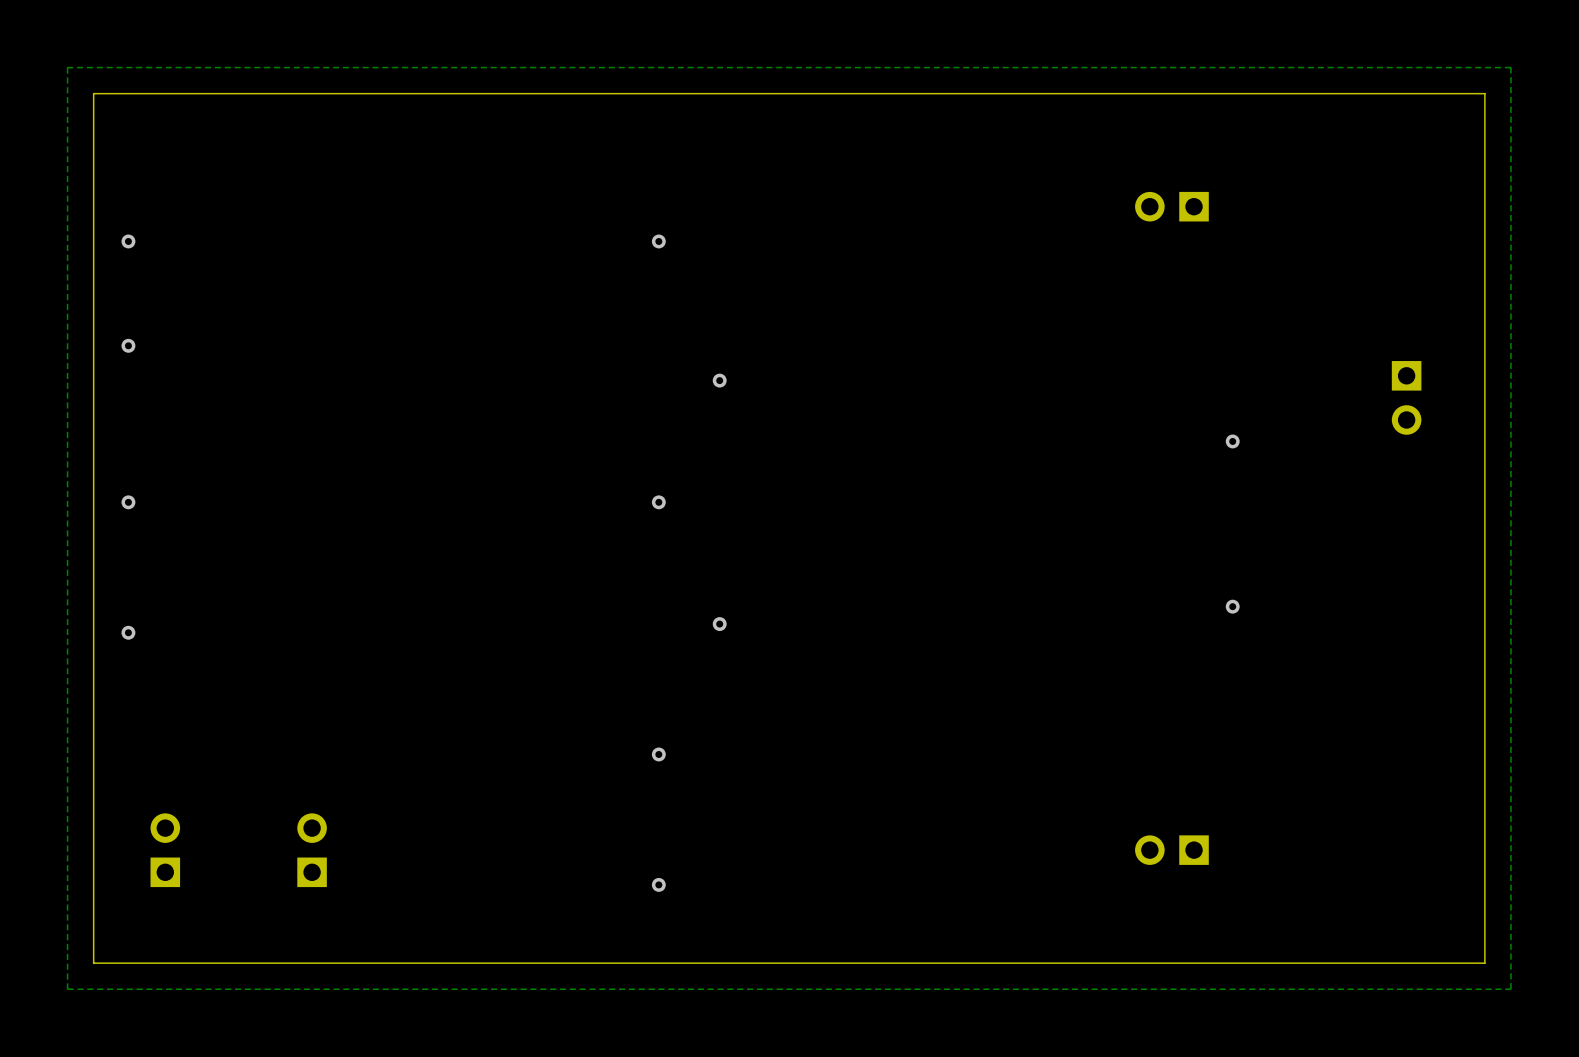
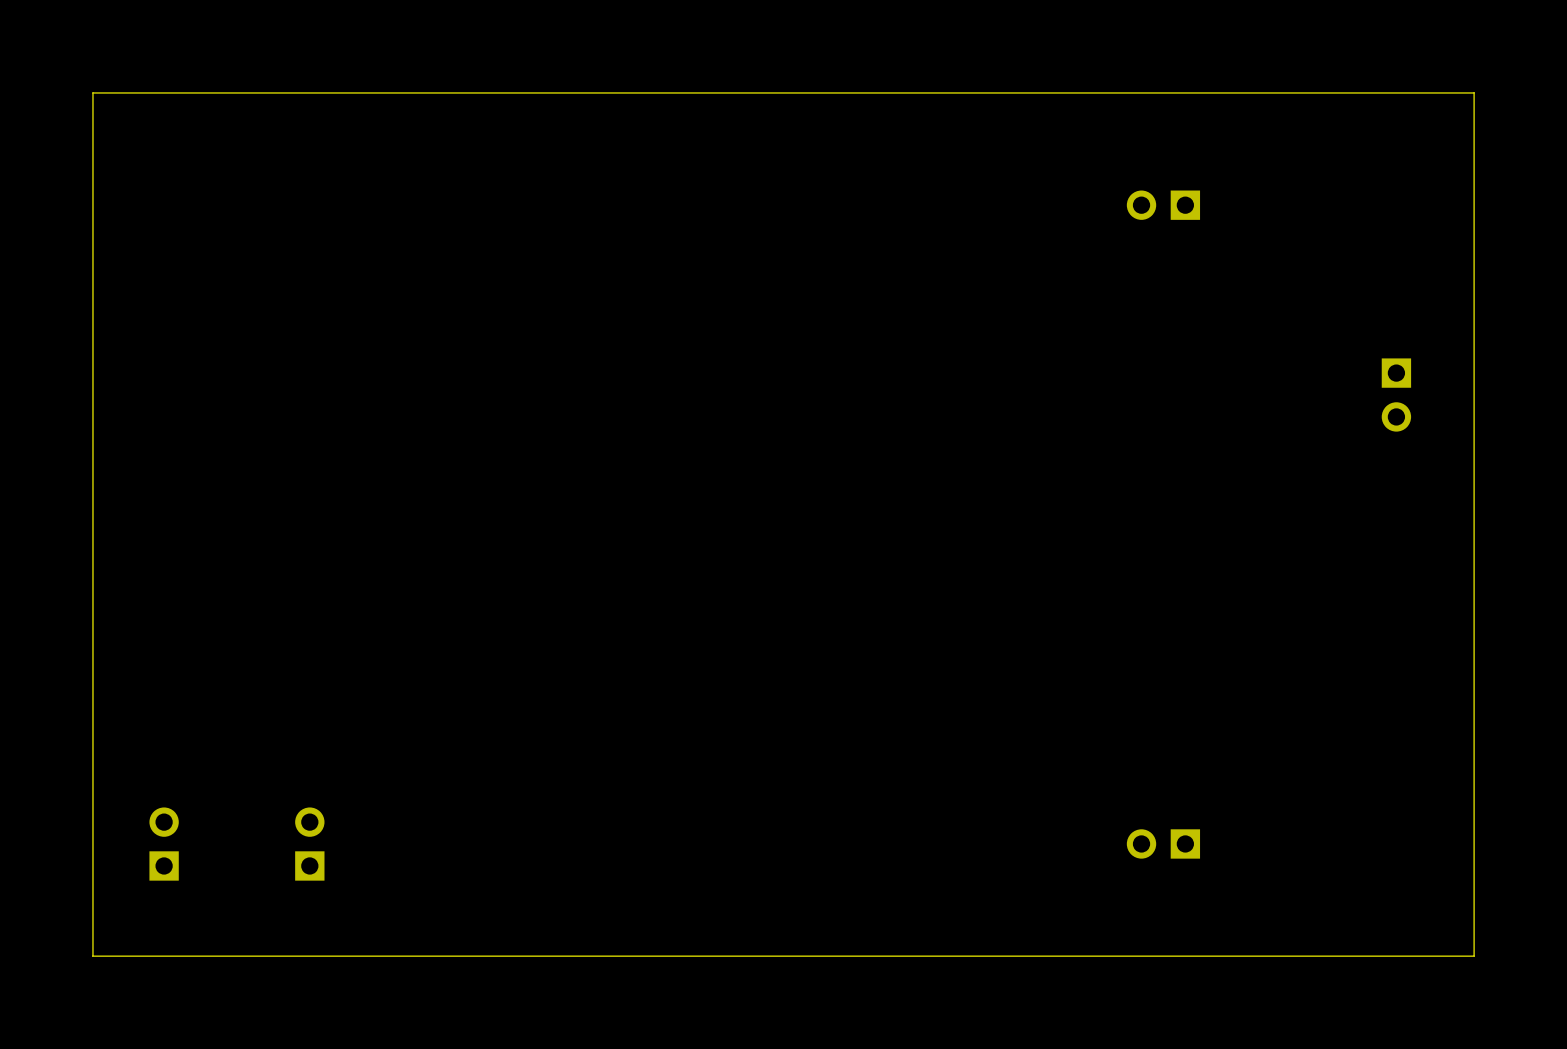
zone outline: (1510, 67) (67, 67) (67, 989) (1510, 989) (1510, 67) -> none
via: (128, 241) -> none
via: (658, 241) -> none
via: (128, 345) -> none
via: (719, 380) -> none
via: (1232, 441) -> none
via: (128, 502) -> none
via: (658, 502) -> none
via: (1232, 606) -> none
via: (719, 624) -> none
via: (128, 632) -> none
via: (658, 754) -> none
via: (658, 884) -> none

